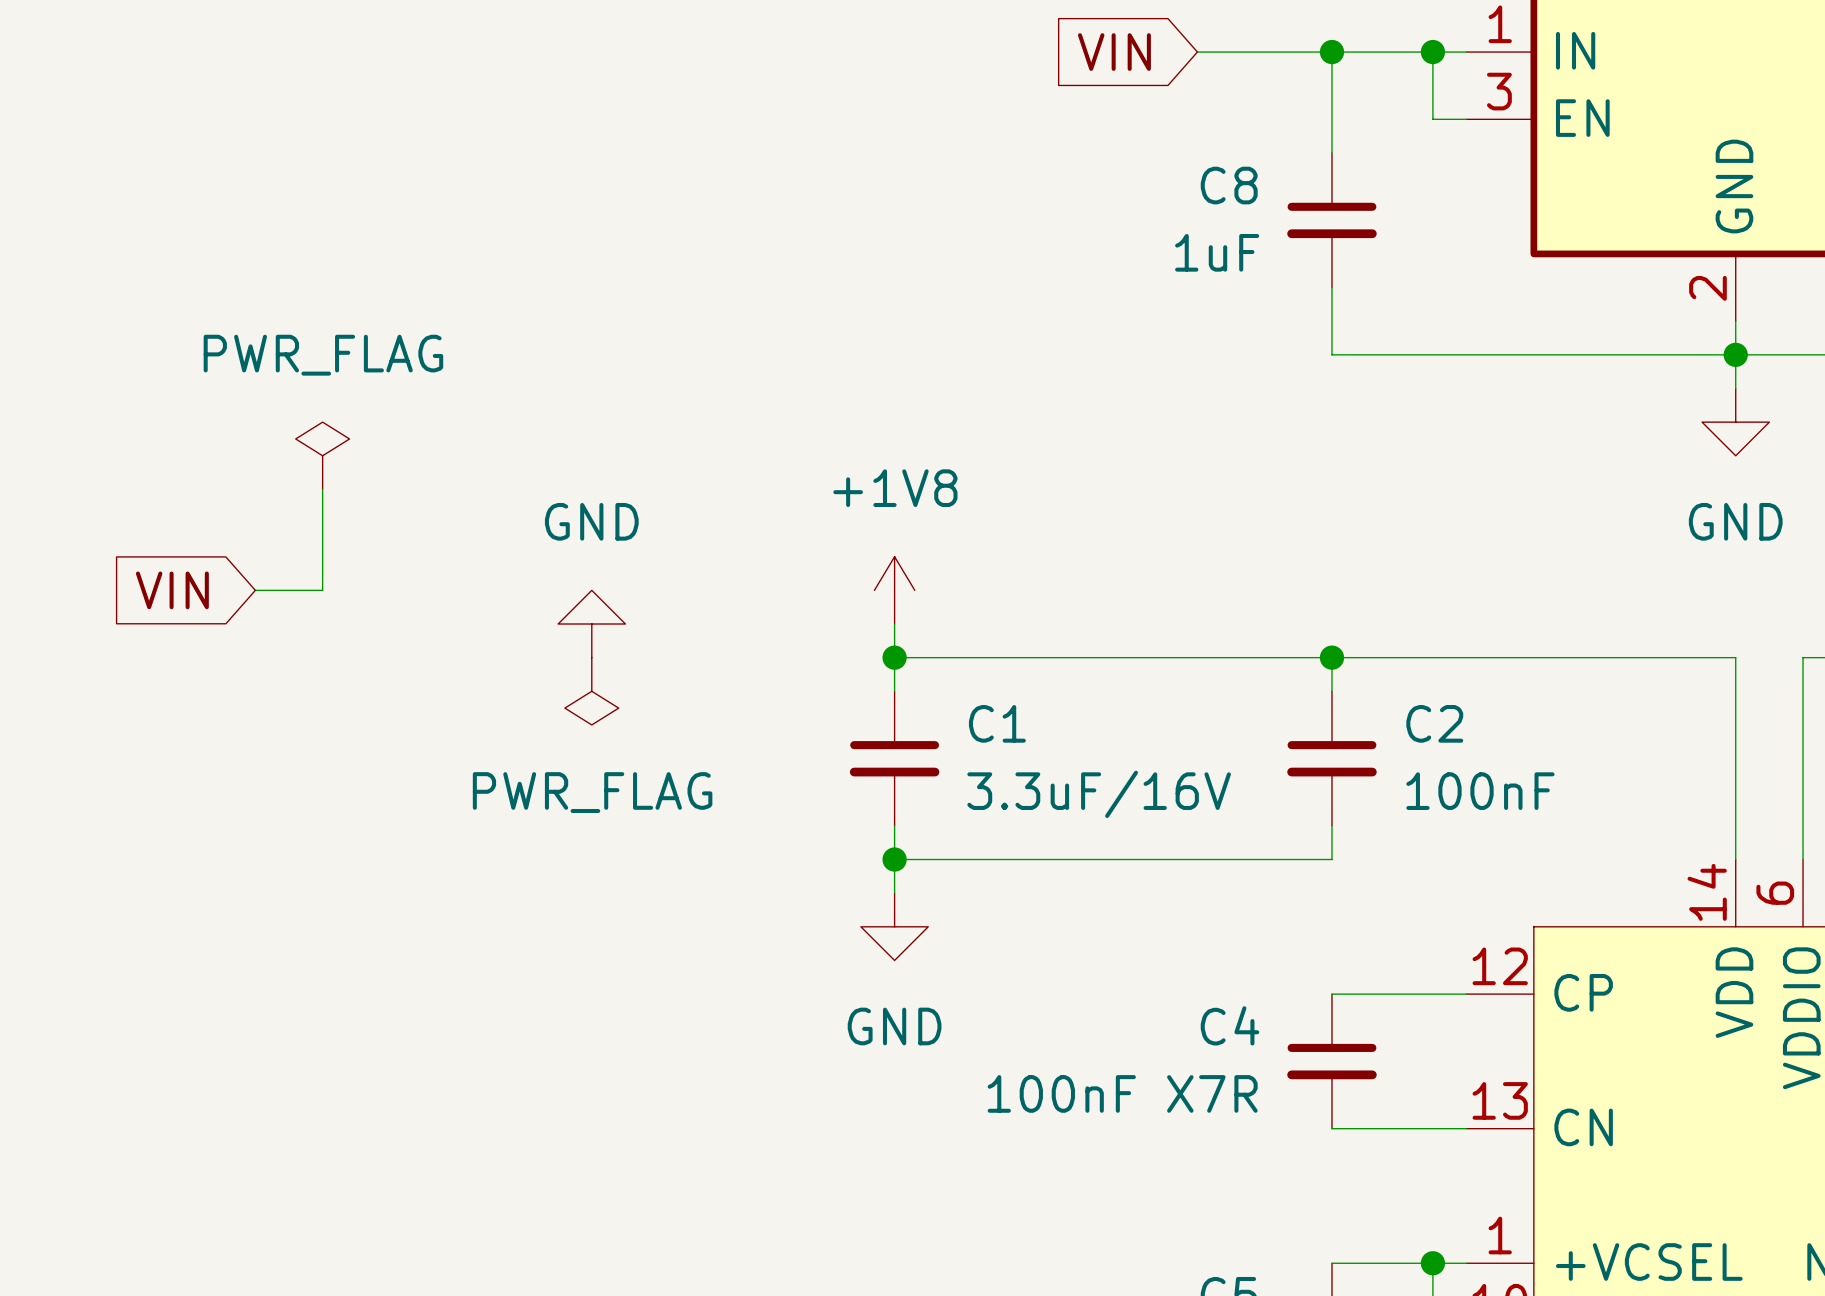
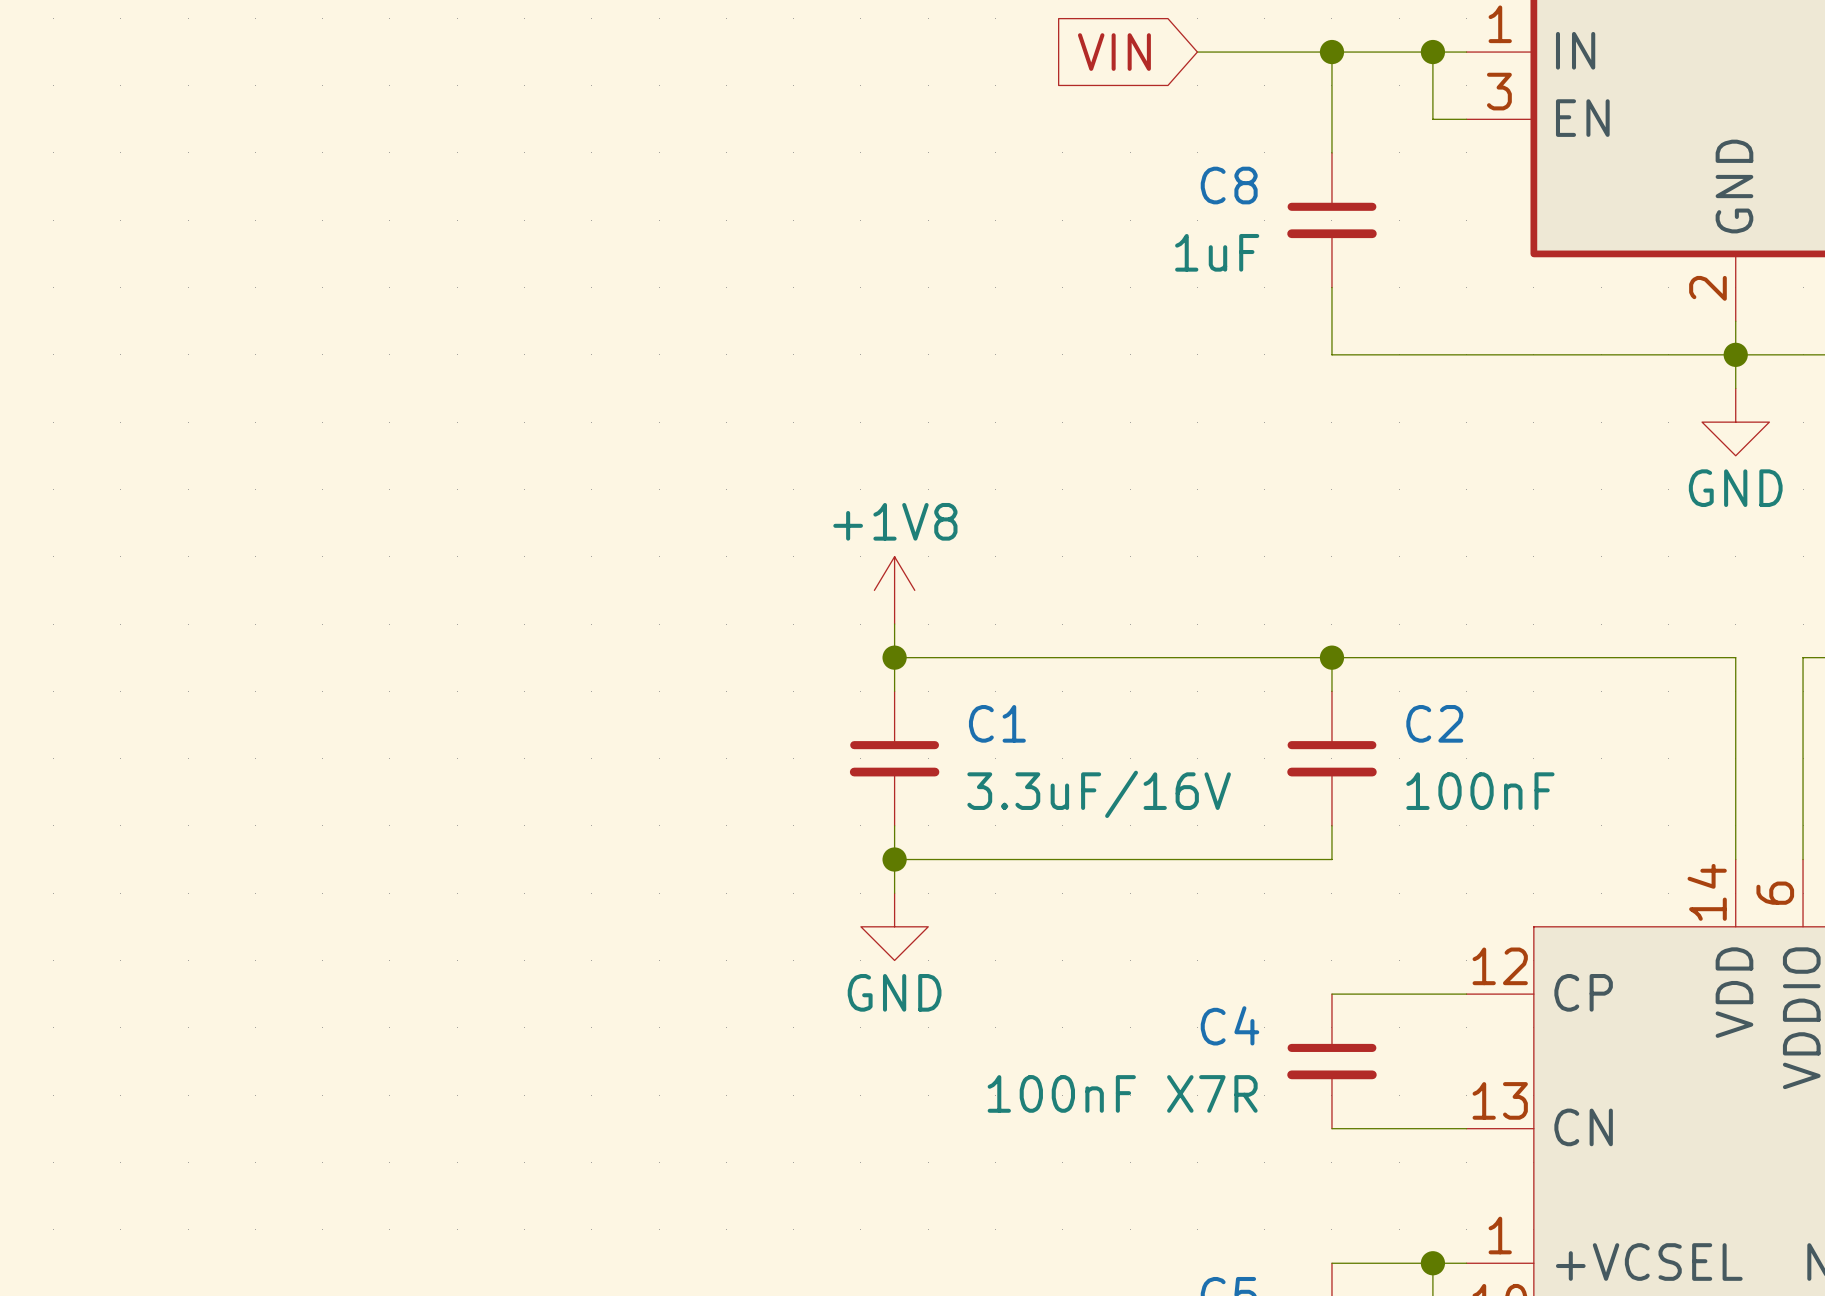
power symbol: PWR_FLAG (322, 455) -> none
power symbol text position: +1V8 (895, 488) -> +1V8 (895, 521)
wire: (322, 489) (322, 590) (255, 590) -> none
power symbol text position: GND (1735, 521) -> GND (1735, 488)
global label: VIN (172, 590) -> none
power symbol: GND (591, 624) -> none
power symbol: PWR_FLAG (591, 691) -> none
power symbol text position: GND (894, 1026) -> GND (894, 992)

